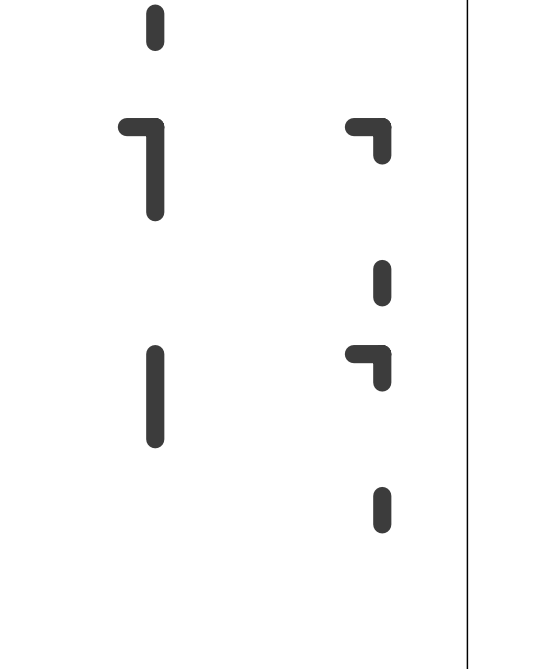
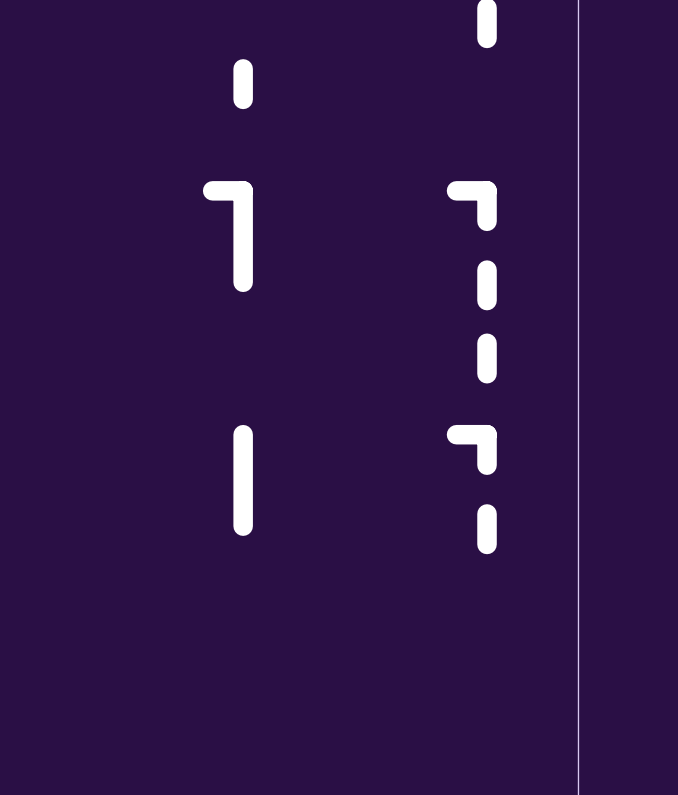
line: none -> (487, 270) (487, 300)
line: (382, 496) (382, 524) -> (487, 513) (487, 544)

